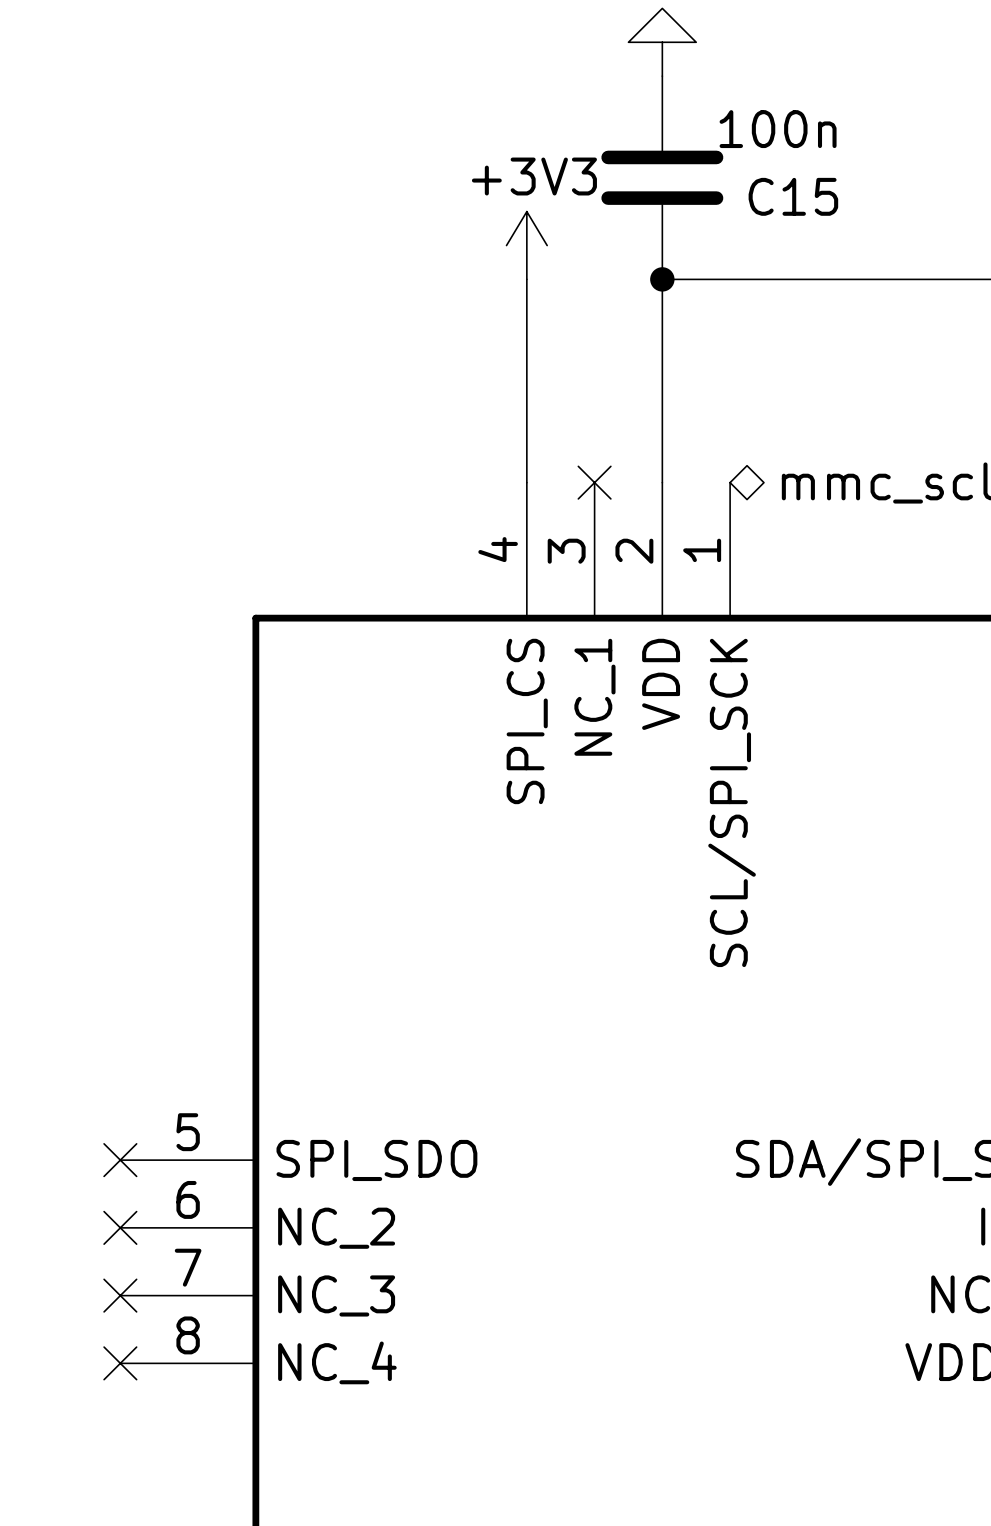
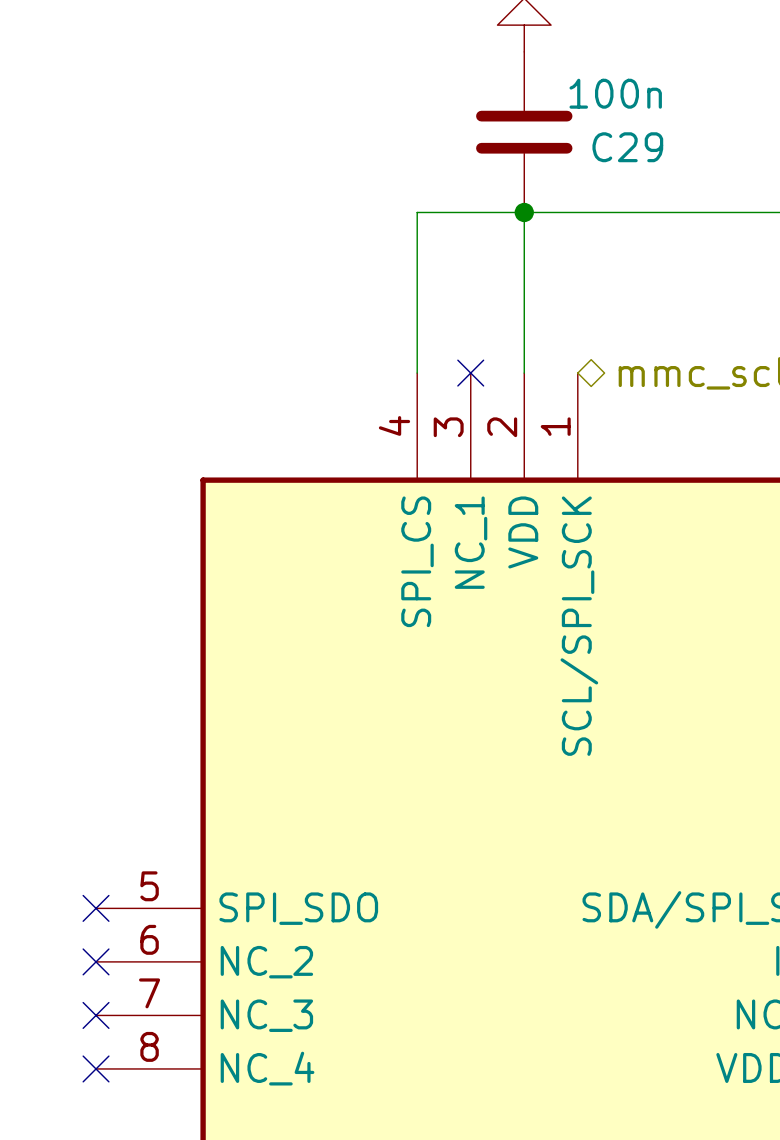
C15 name: C15 (793, 196) -> C29 (627, 147)
power symbol: +3V3 (526, 245) -> none
wire: none -> (417, 212) (524, 212)

